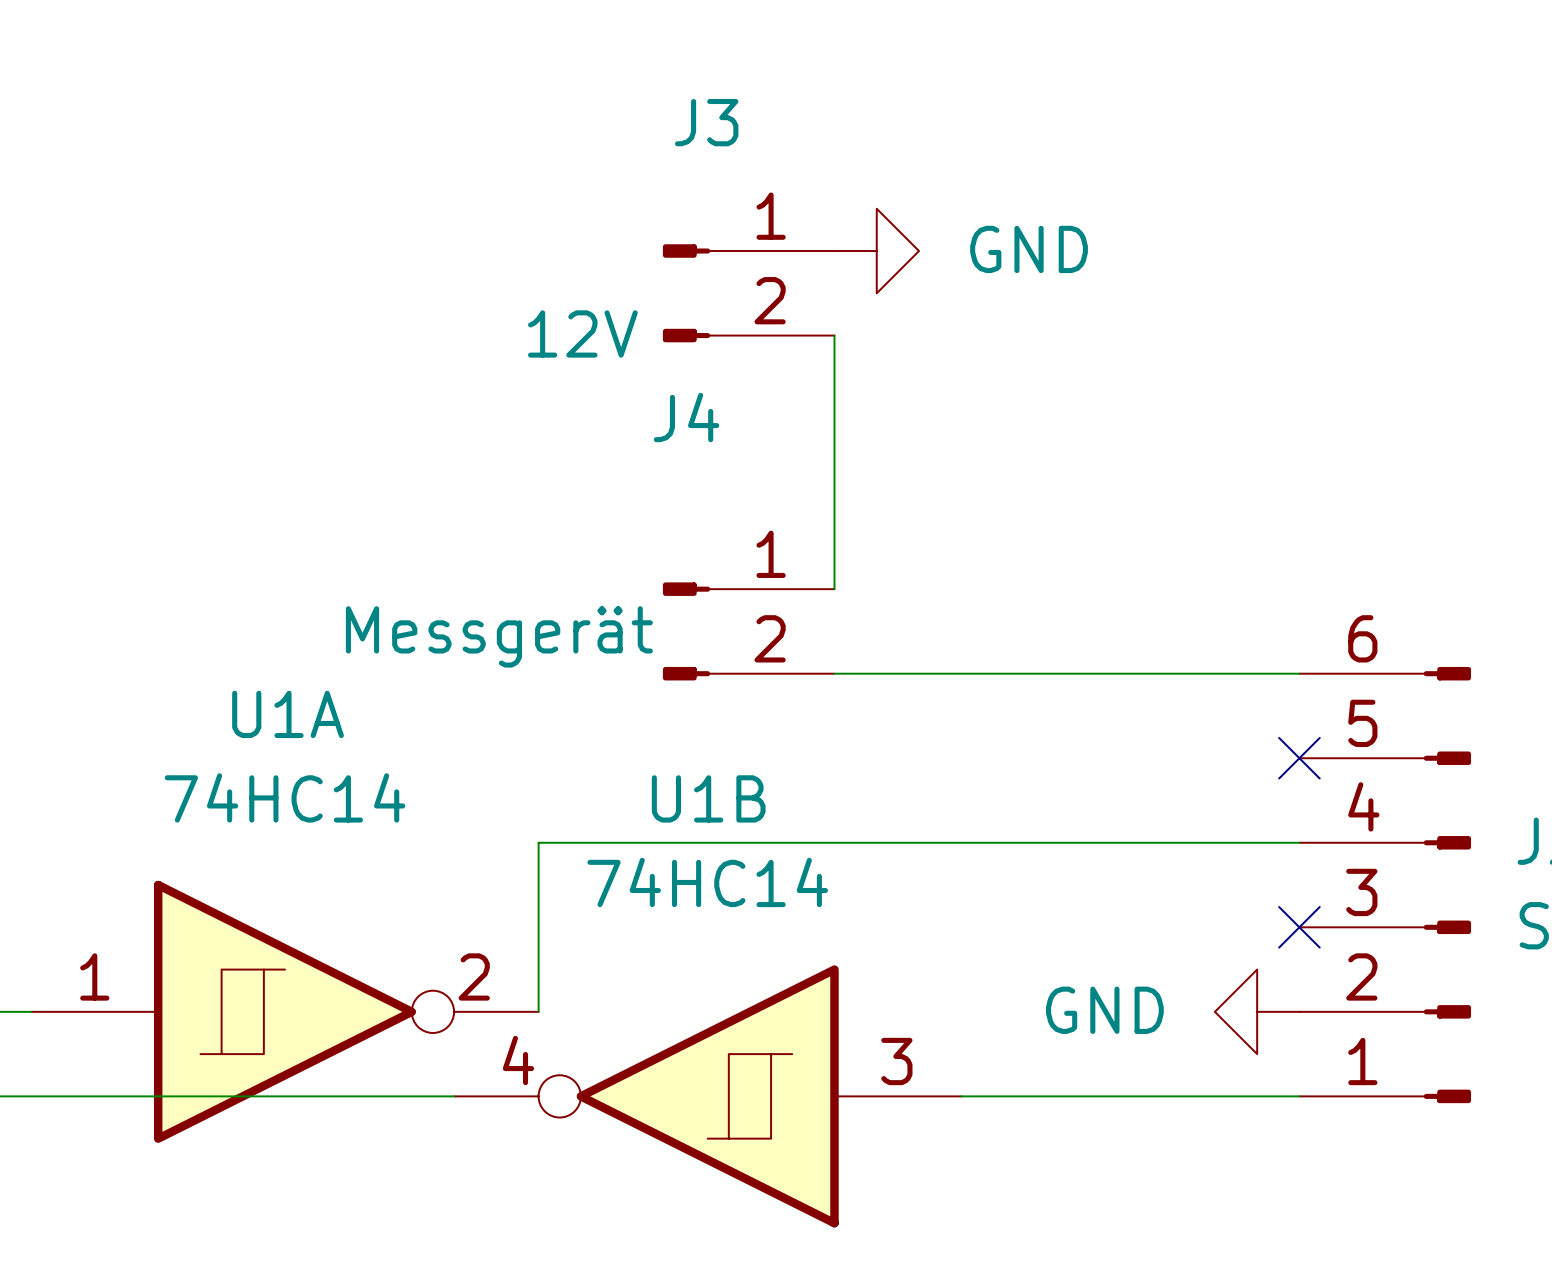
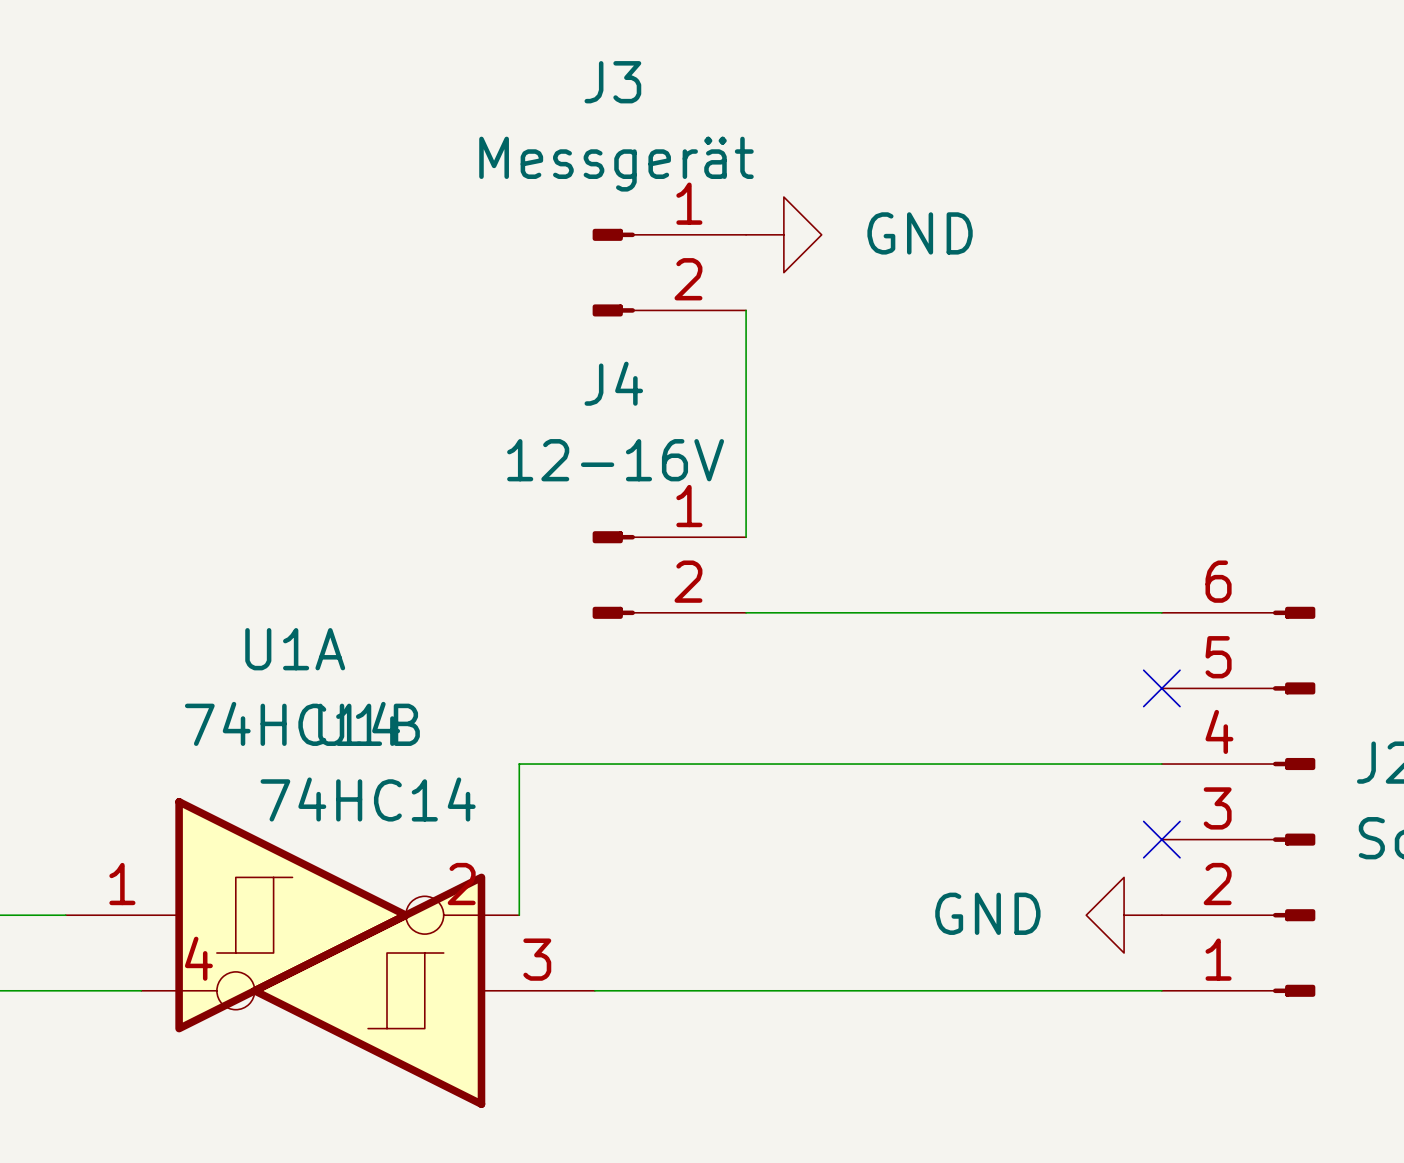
J3 name position: J3 (706, 122) -> J3 (612, 82)
J3 value: 12V (582, 333) -> Messgerät (616, 164)
J4 value: Messgerät (499, 636) -> 12-16V (615, 460)
wire: (580, 842) (538, 842) (538, 1011) -> (519, 764) (519, 915)
U1A position: (285, 1011) -> (292, 915)
U1B position: (707, 1096) -> (368, 990)

